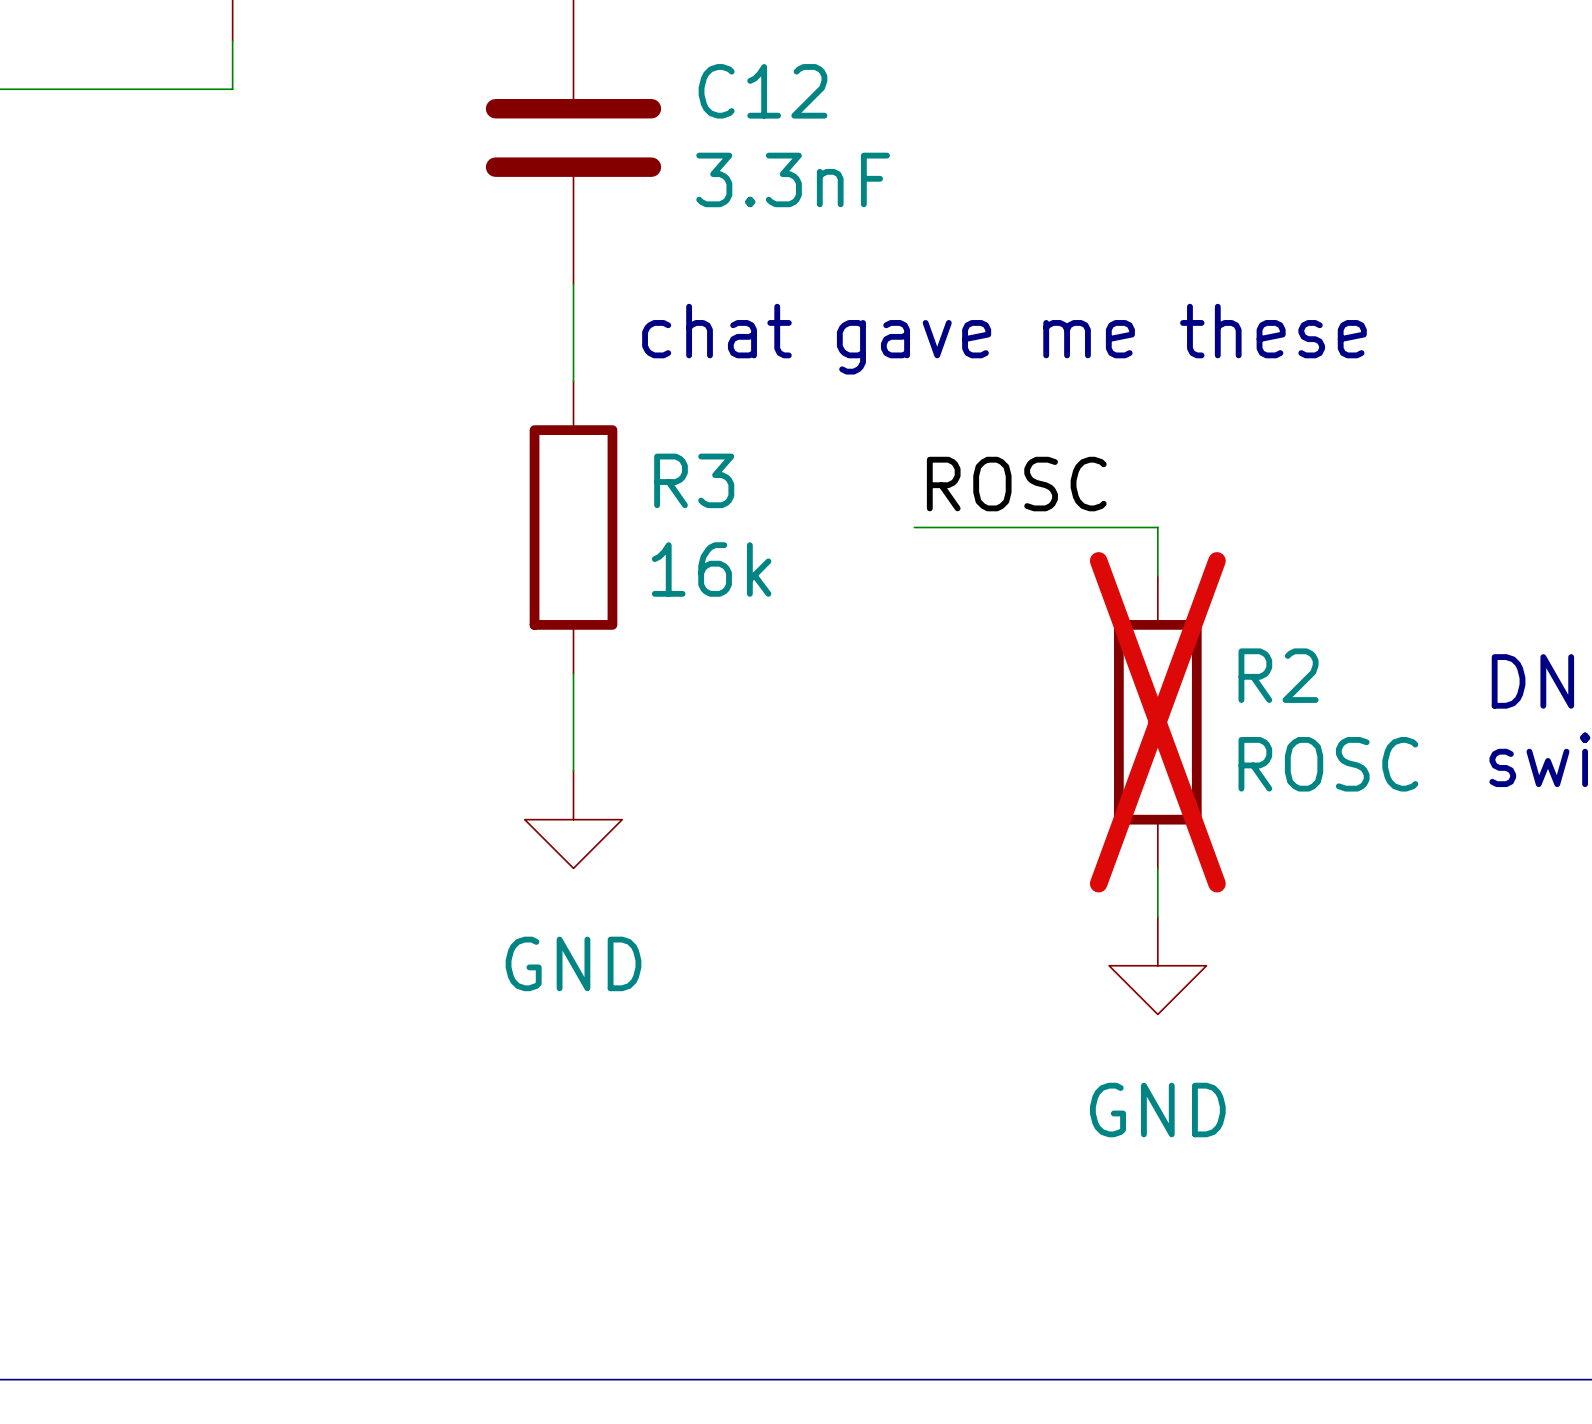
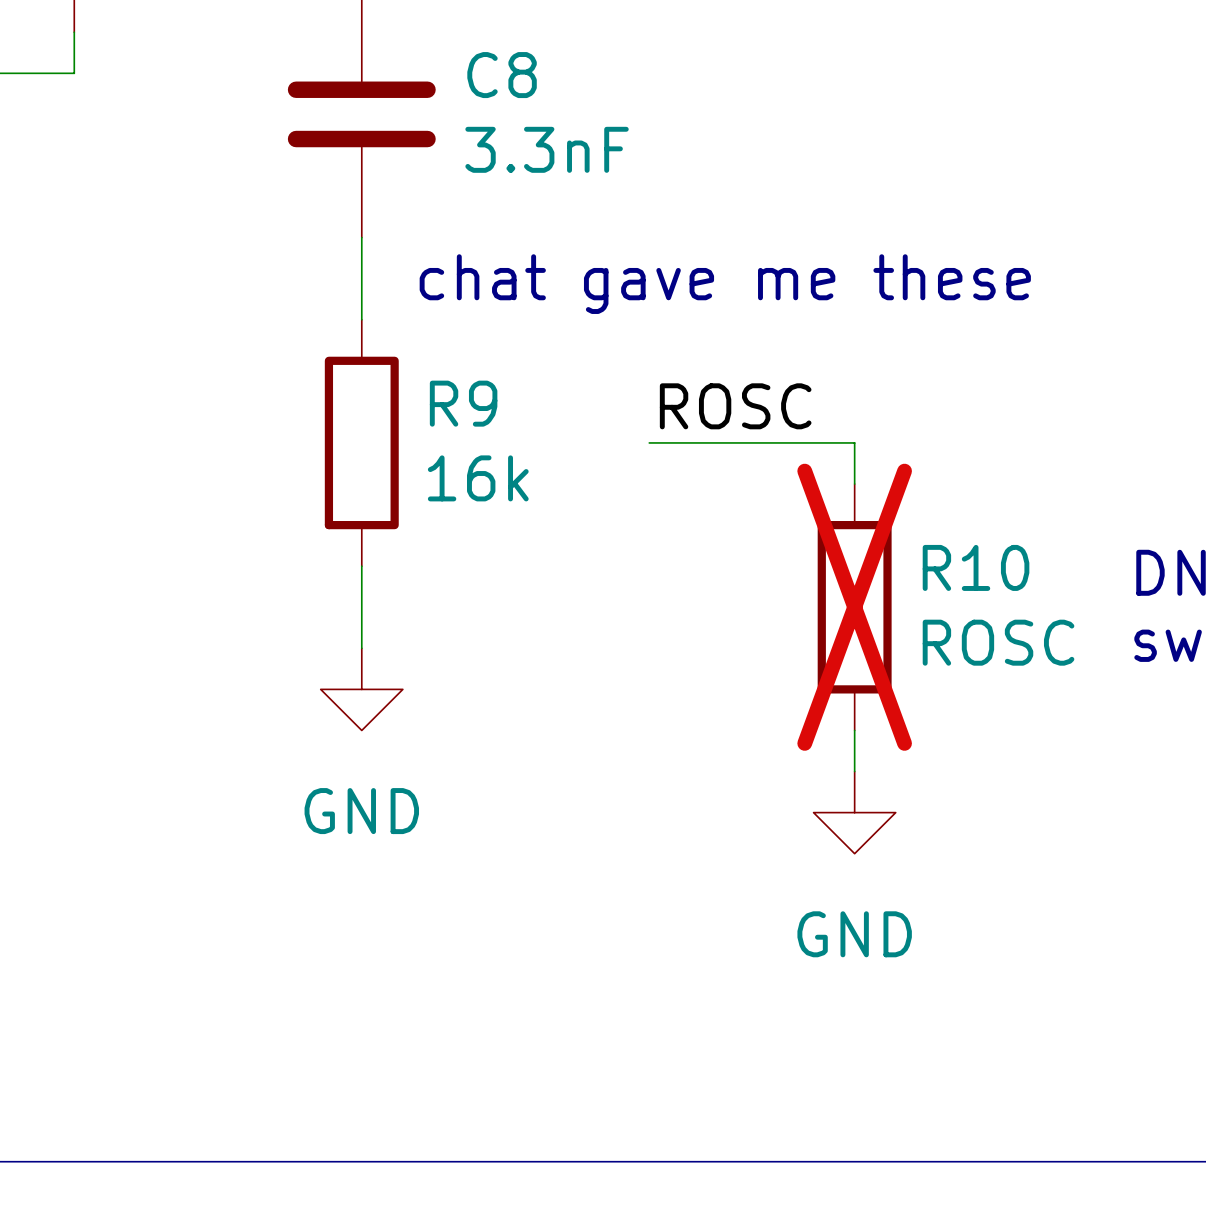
C12 name: C12 (762, 91) -> C8 (502, 75)
R3 name: R3 (694, 480) -> R9 (463, 403)
R2 name: R2 (1278, 675) -> R10 (976, 567)

